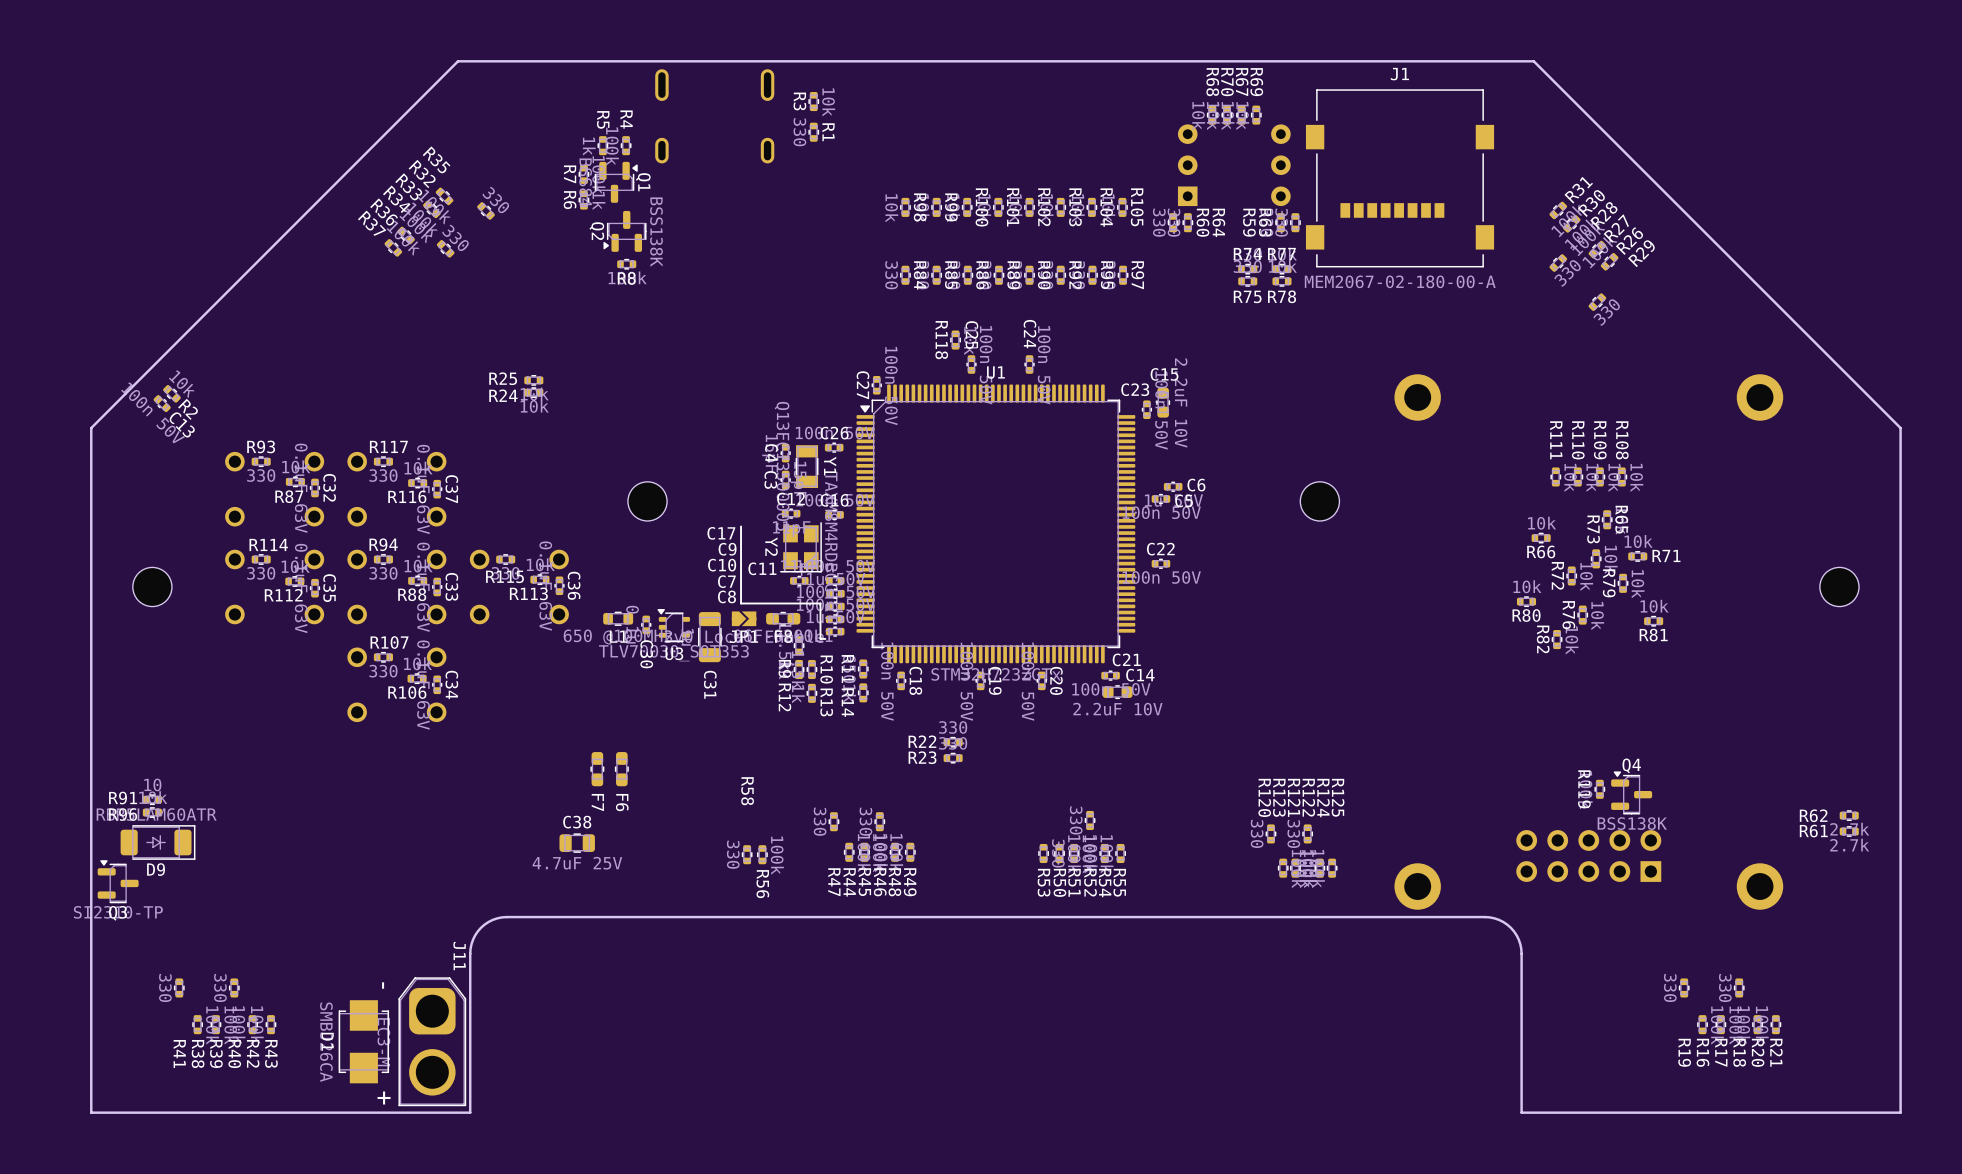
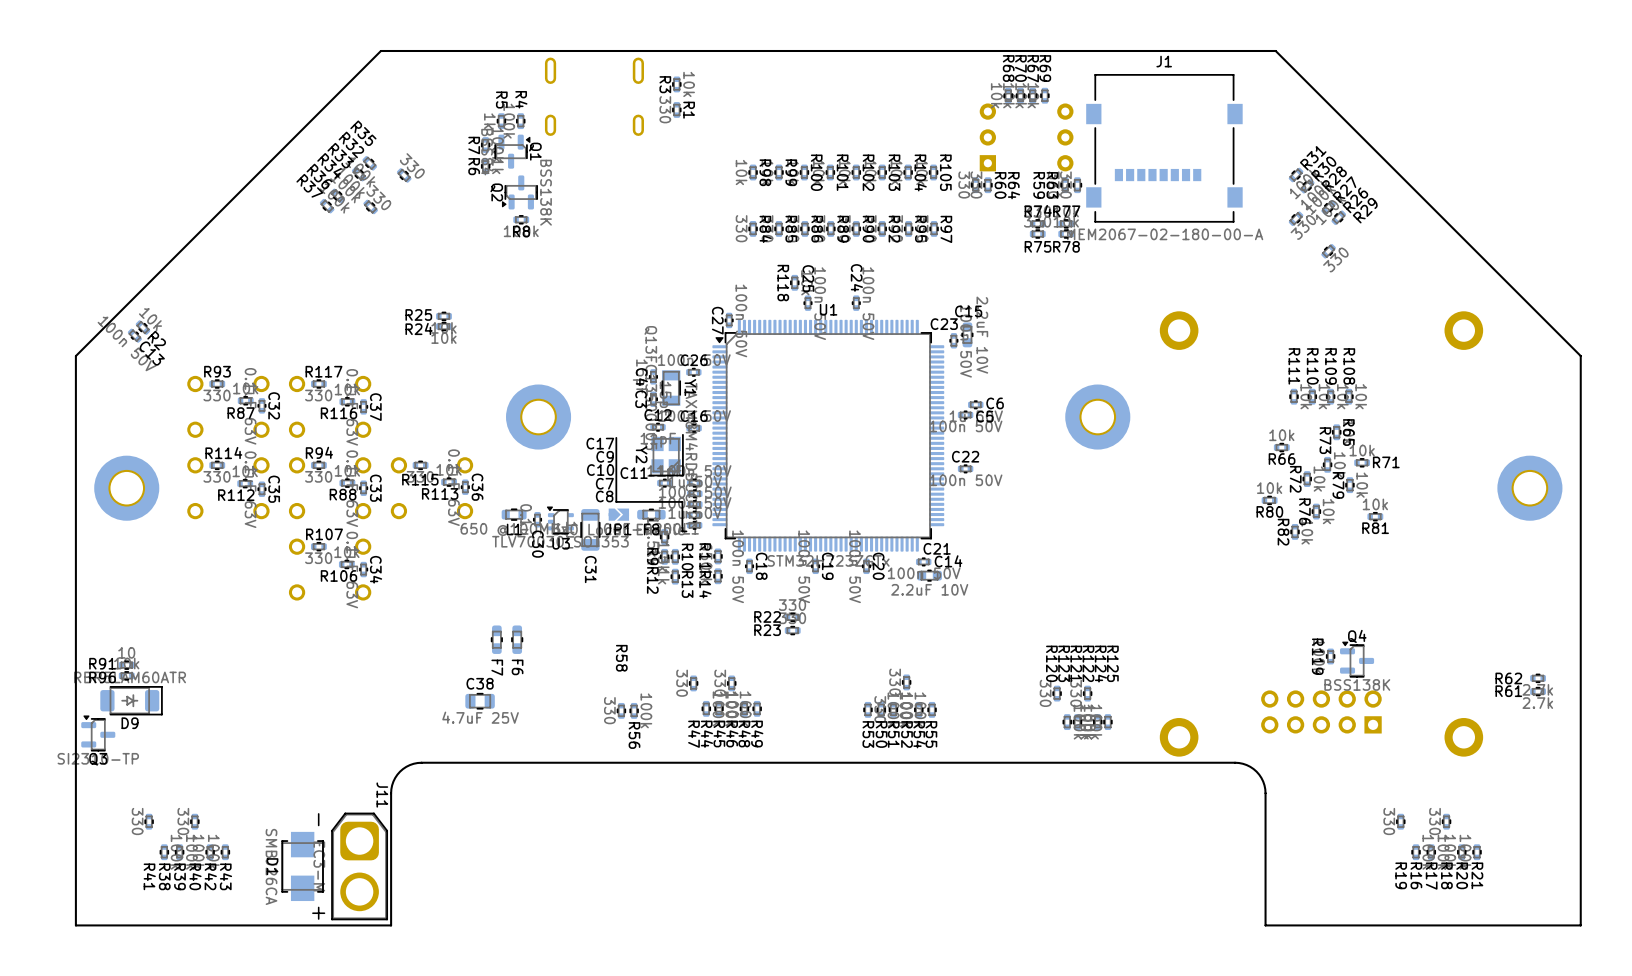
part footprint: [627, 481, 668, 521] -> [506, 384, 572, 450]
part footprint: [1300, 481, 1340, 521] -> [1065, 384, 1131, 450]
part footprint: [132, 567, 172, 607] -> [94, 455, 160, 521]
part footprint: [1819, 567, 1860, 607] -> [1497, 455, 1563, 521]

